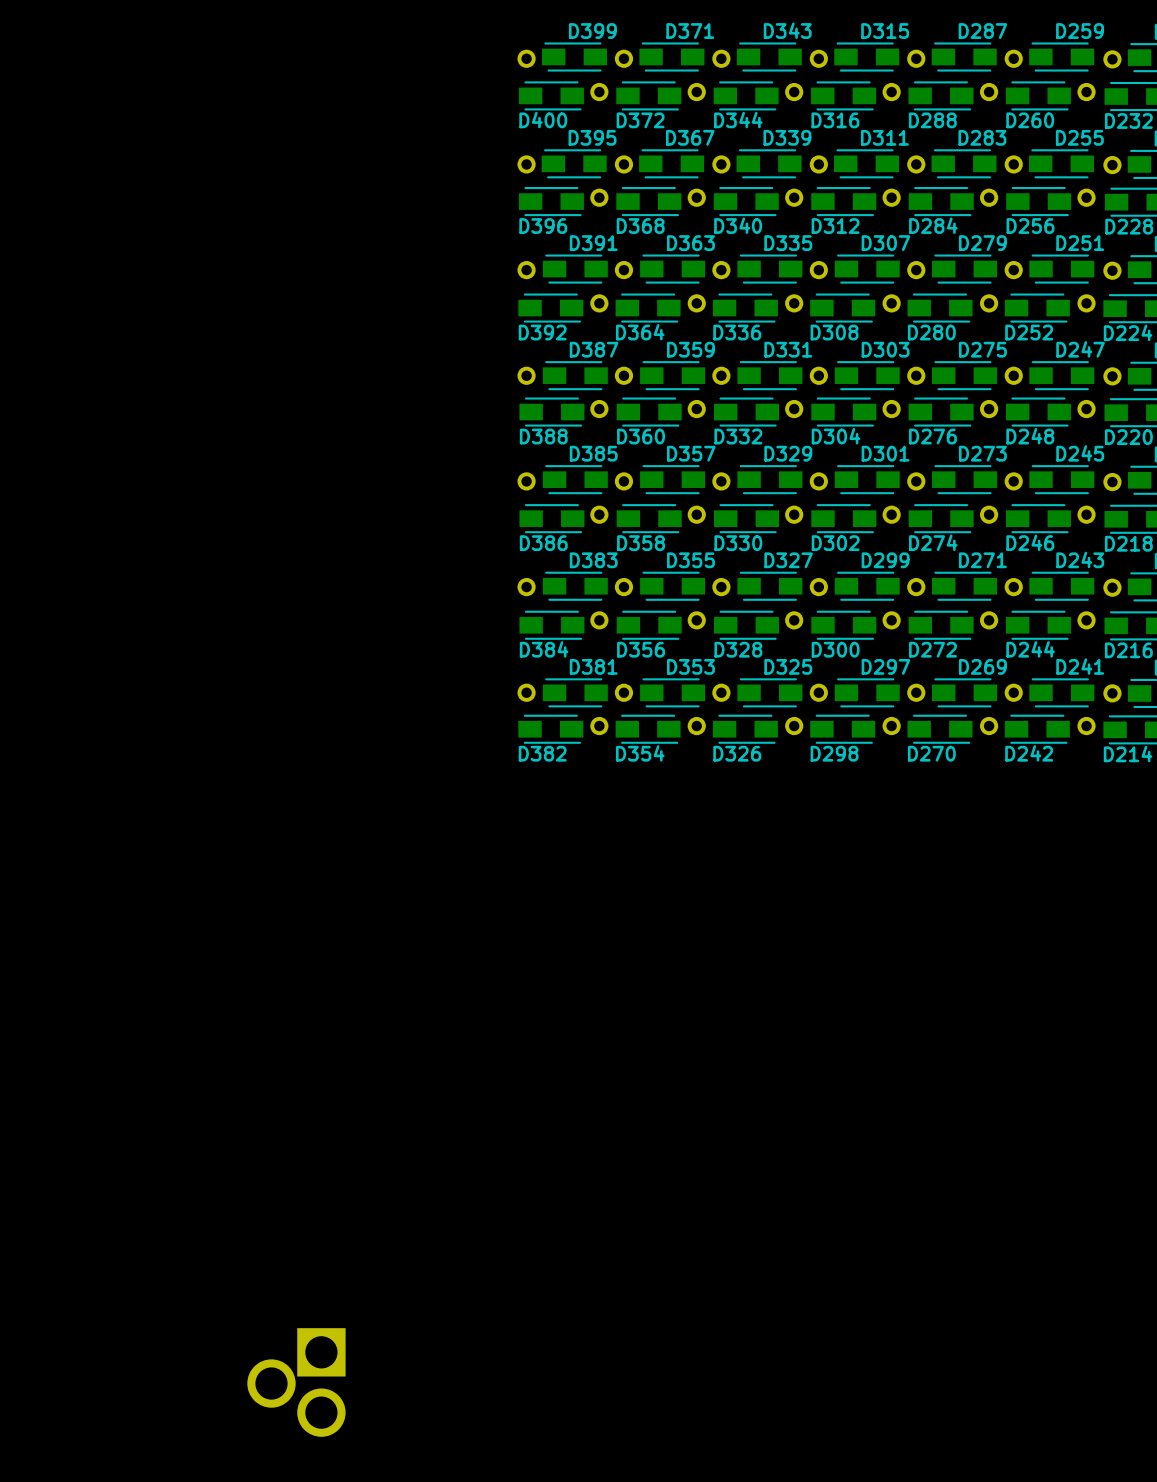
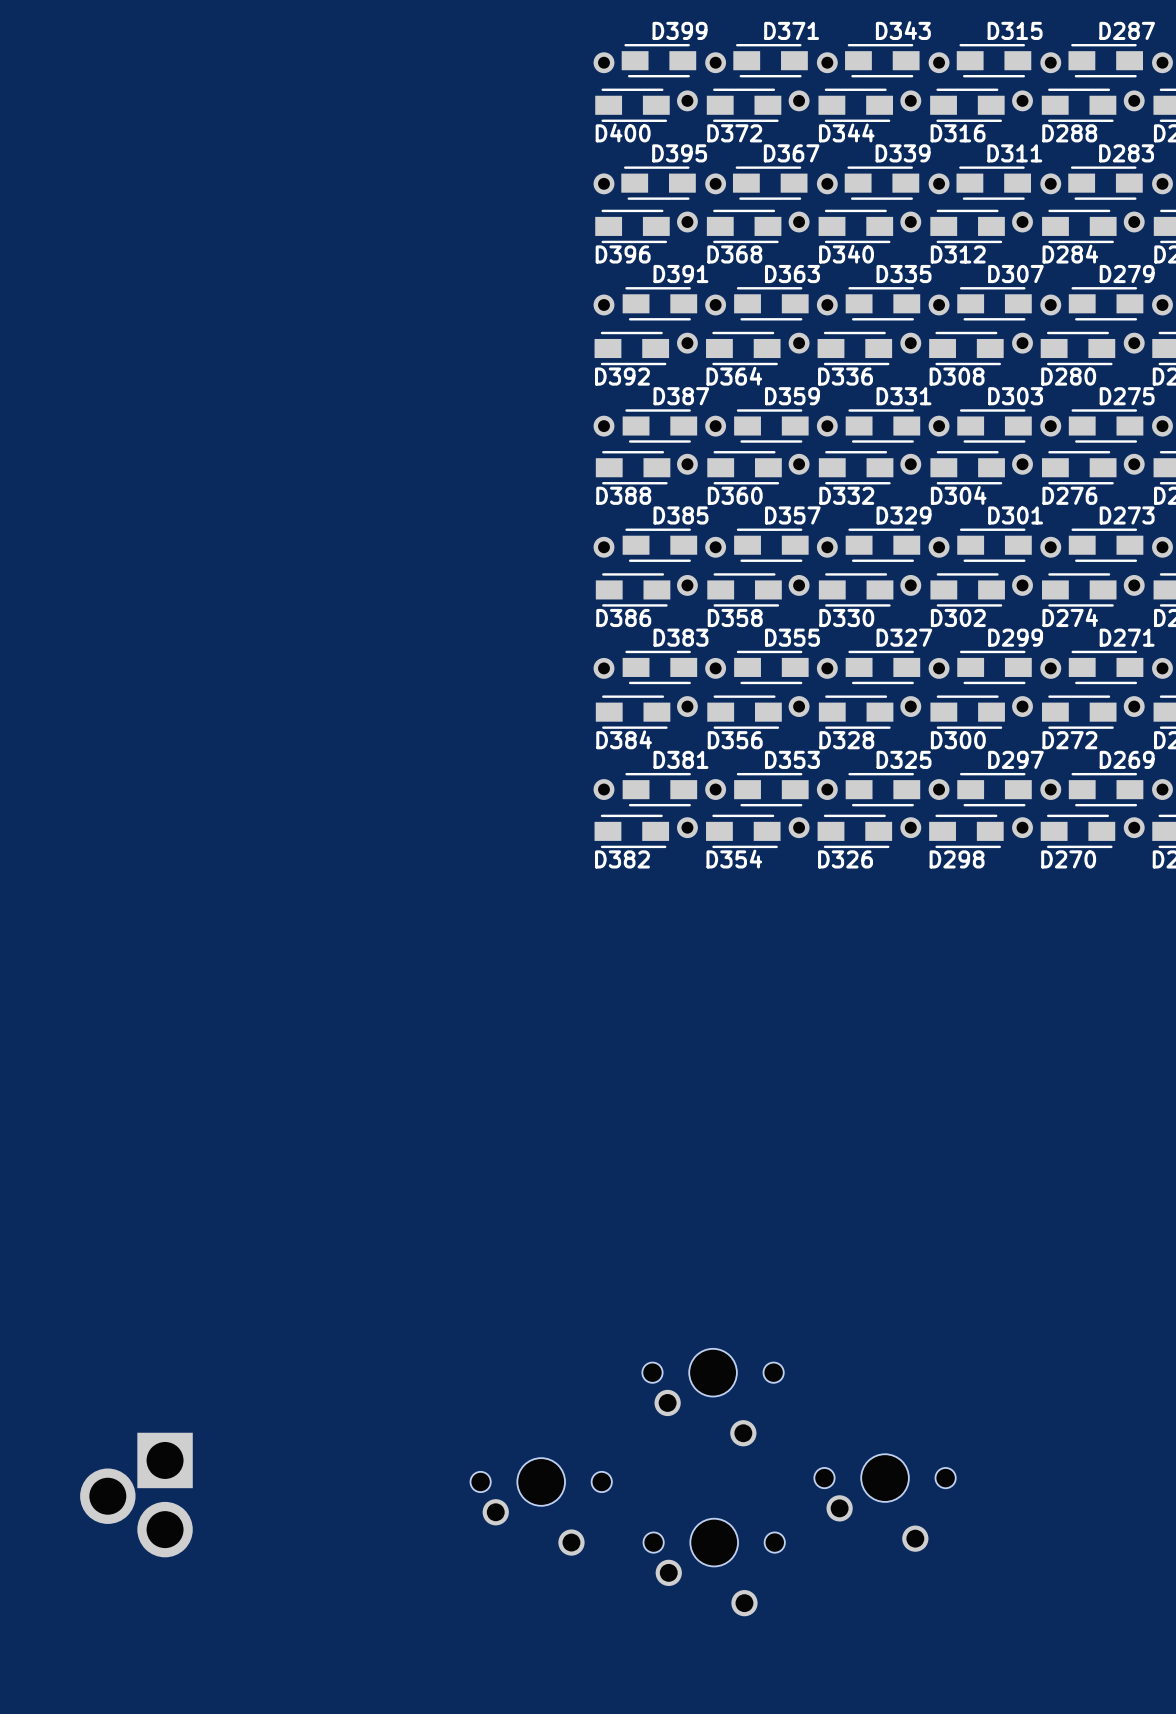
part: none -> (713, 1397)
part: none -> (885, 1502)
part: none -> (541, 1506)
part: none -> (714, 1567)
part position: (296, 1382) -> (136, 1495)

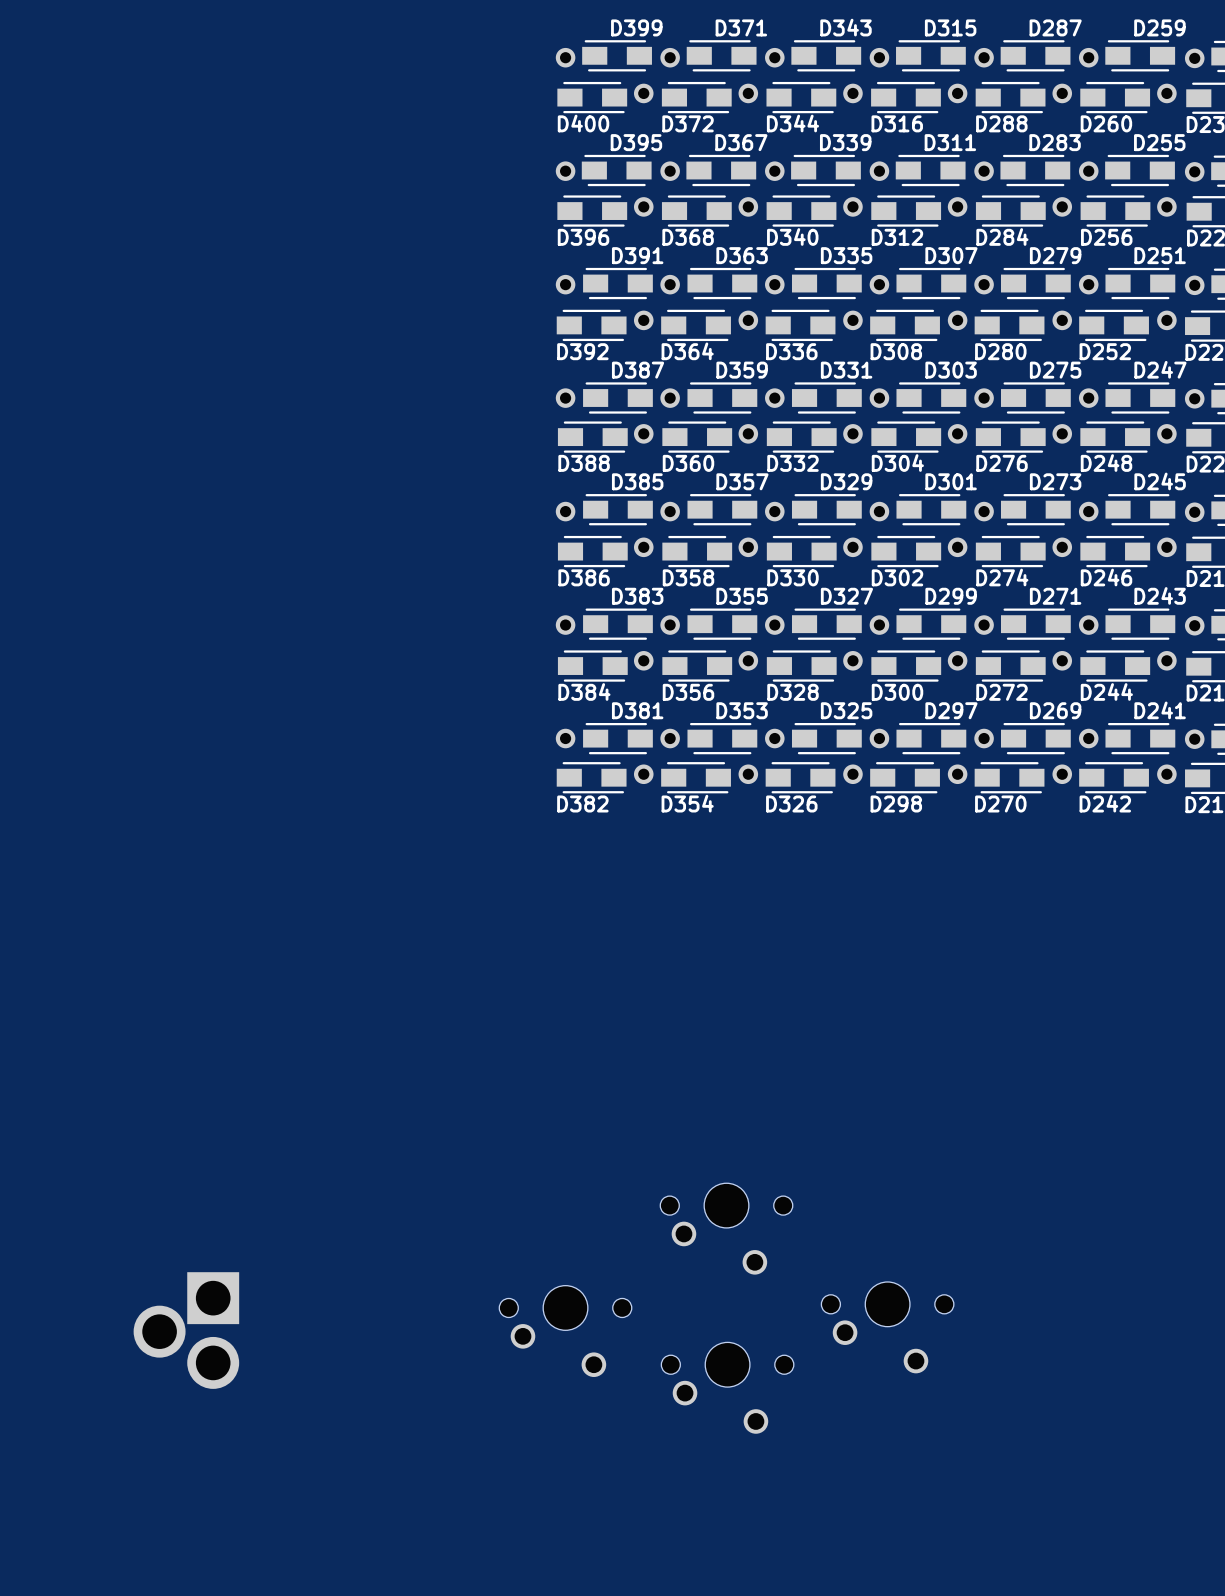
part: none -> (726, 1228)
part: (713, 1397) -> none
part: none -> (887, 1327)
part: none -> (565, 1331)
part: none -> (727, 1388)
part position: (136, 1495) -> (186, 1330)
part: (885, 1502) -> none
part: (541, 1506) -> none
part: (714, 1567) -> none

